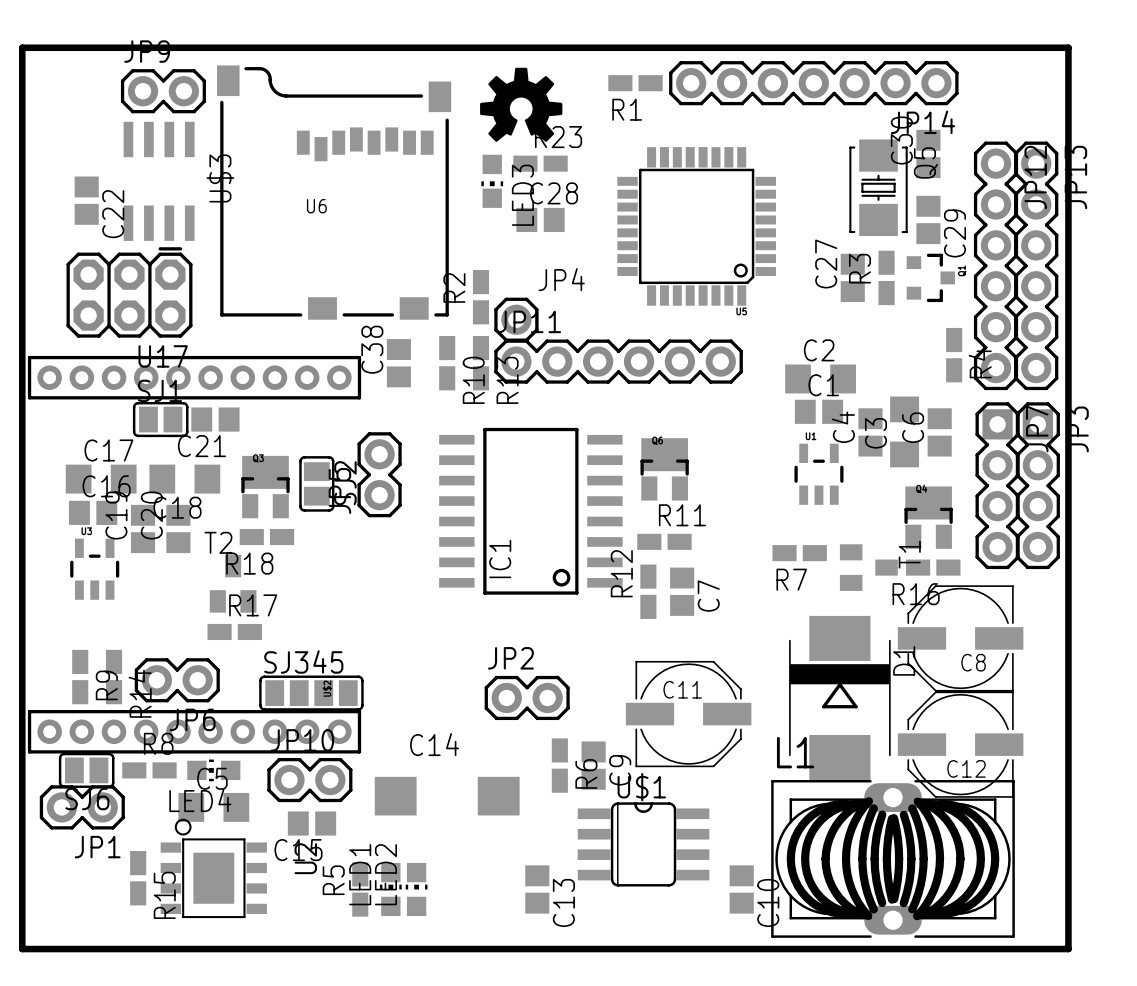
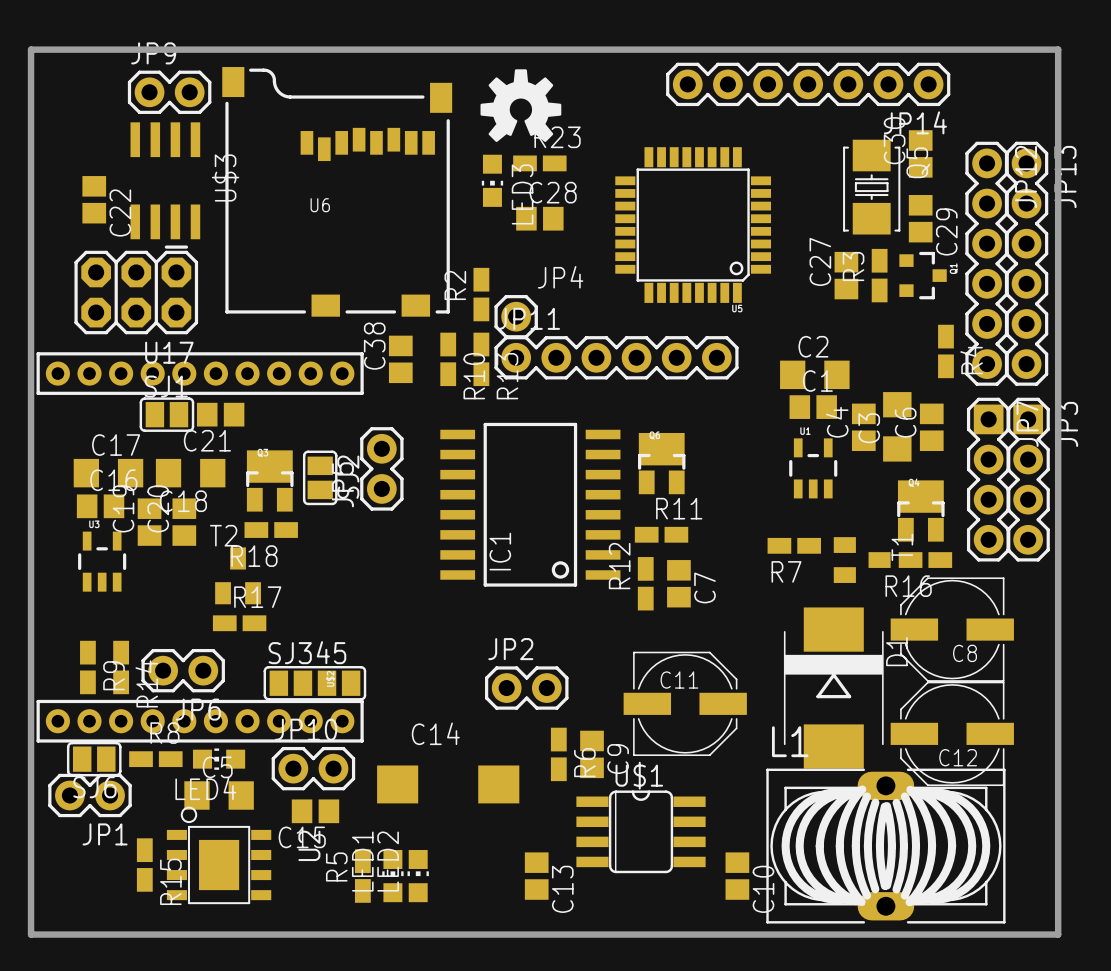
R1: (635, 83) -> none

